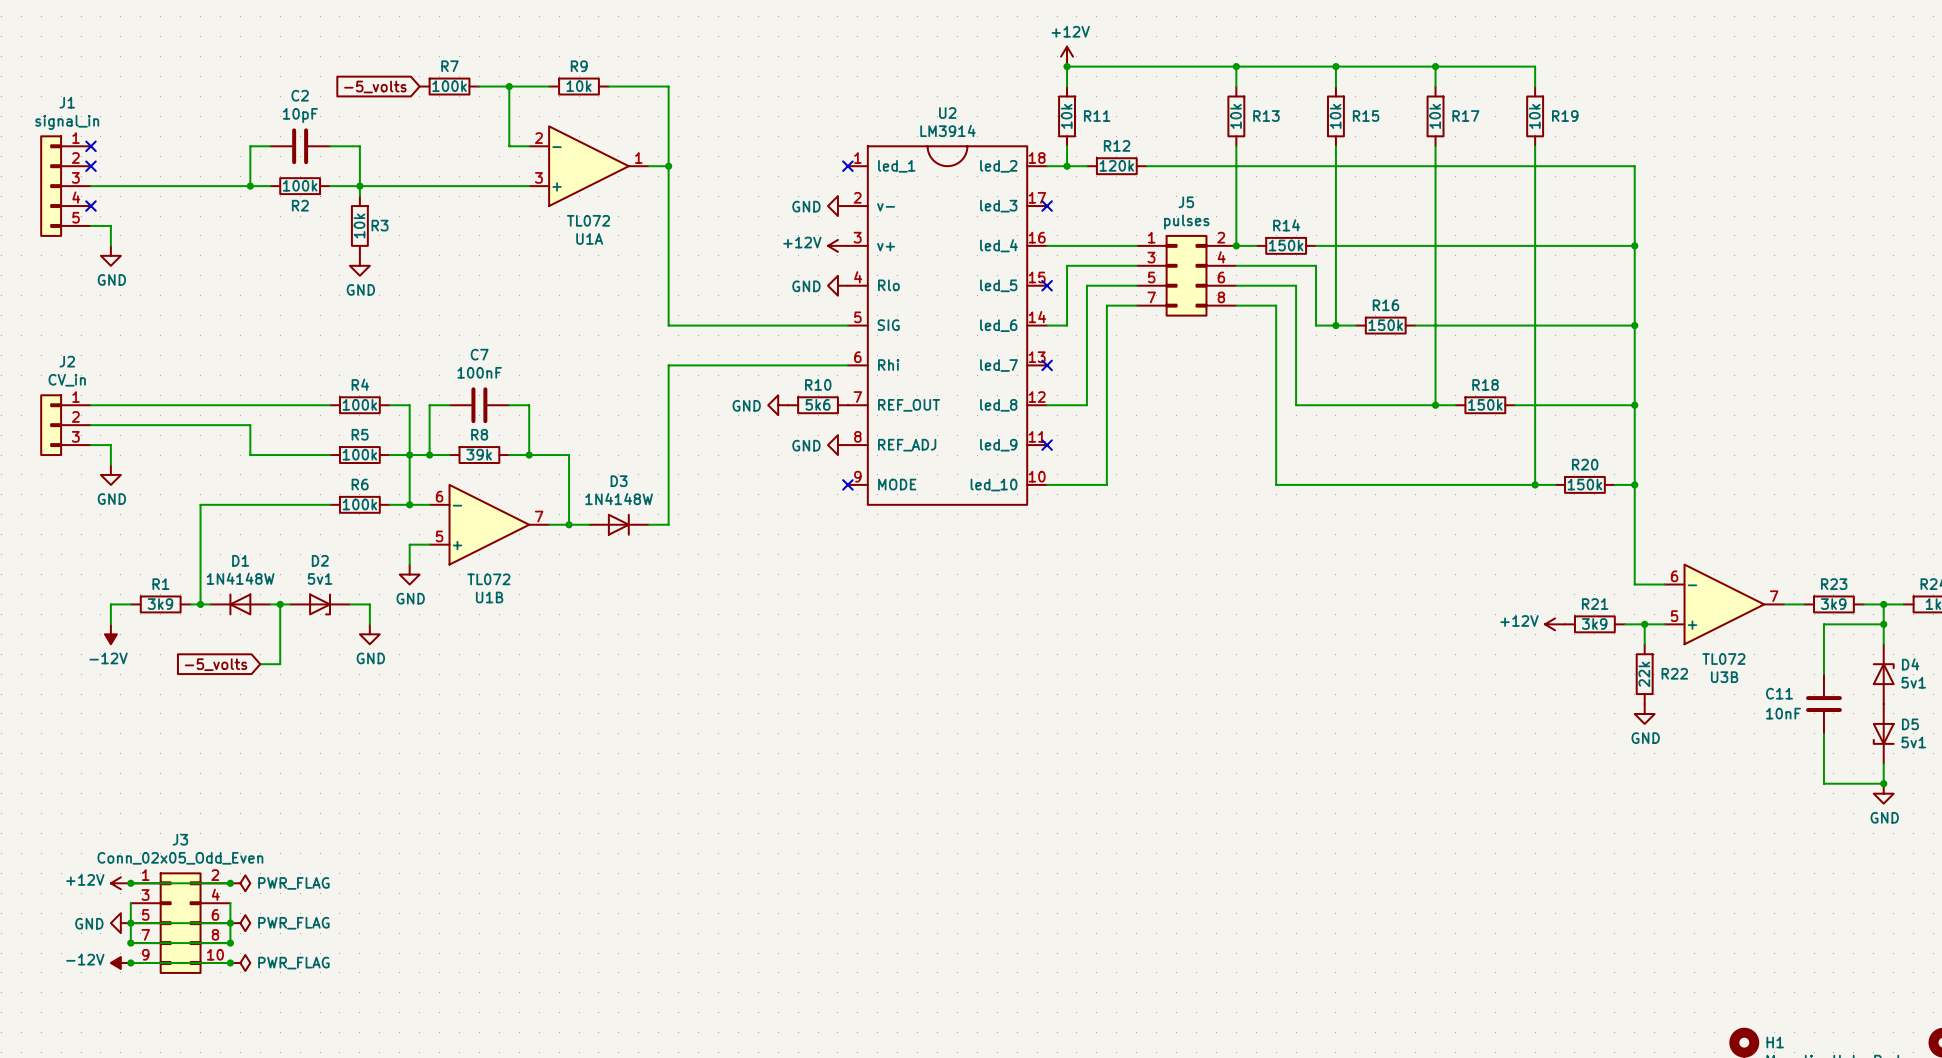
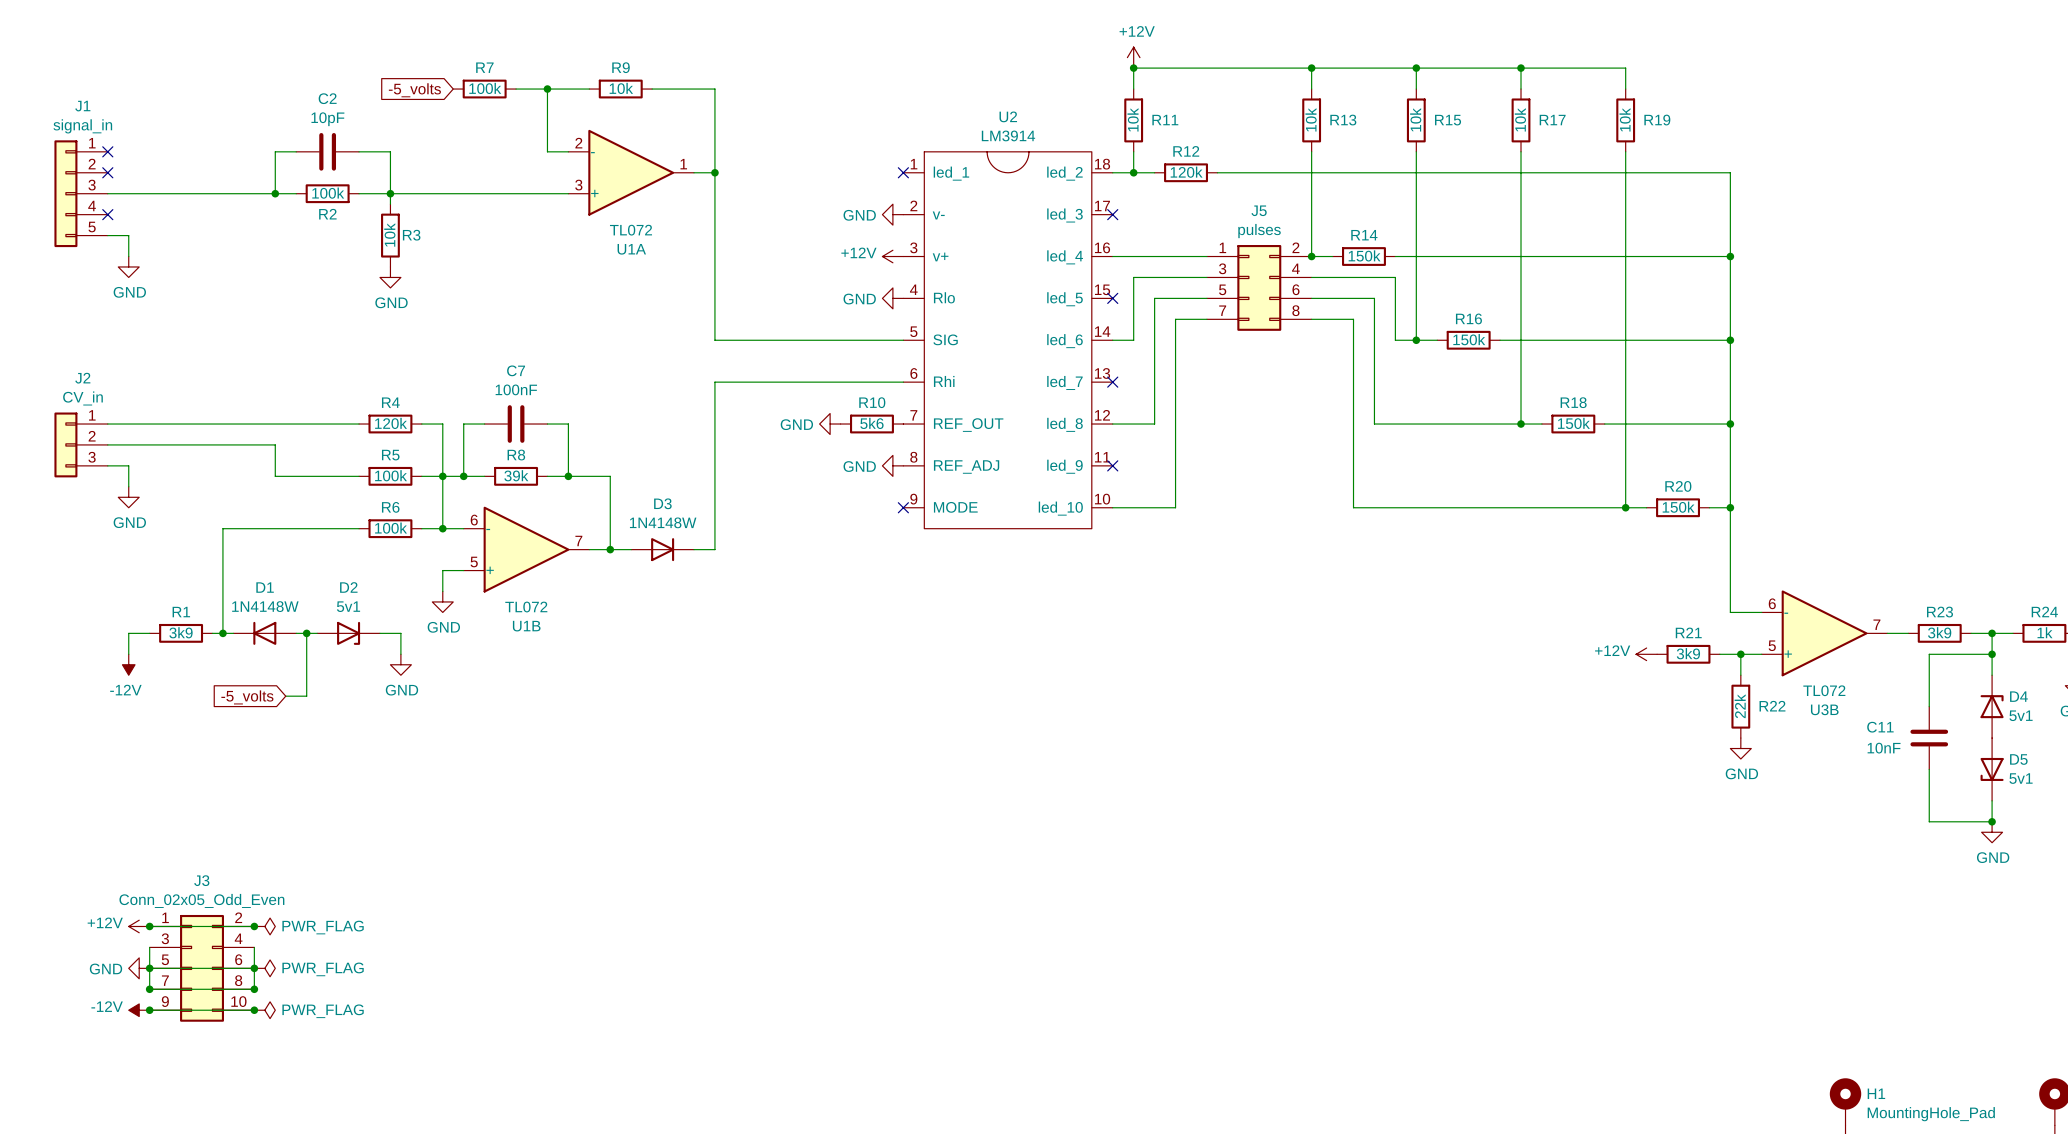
R4 value: 100k (359, 404) -> 120k (391, 423)

